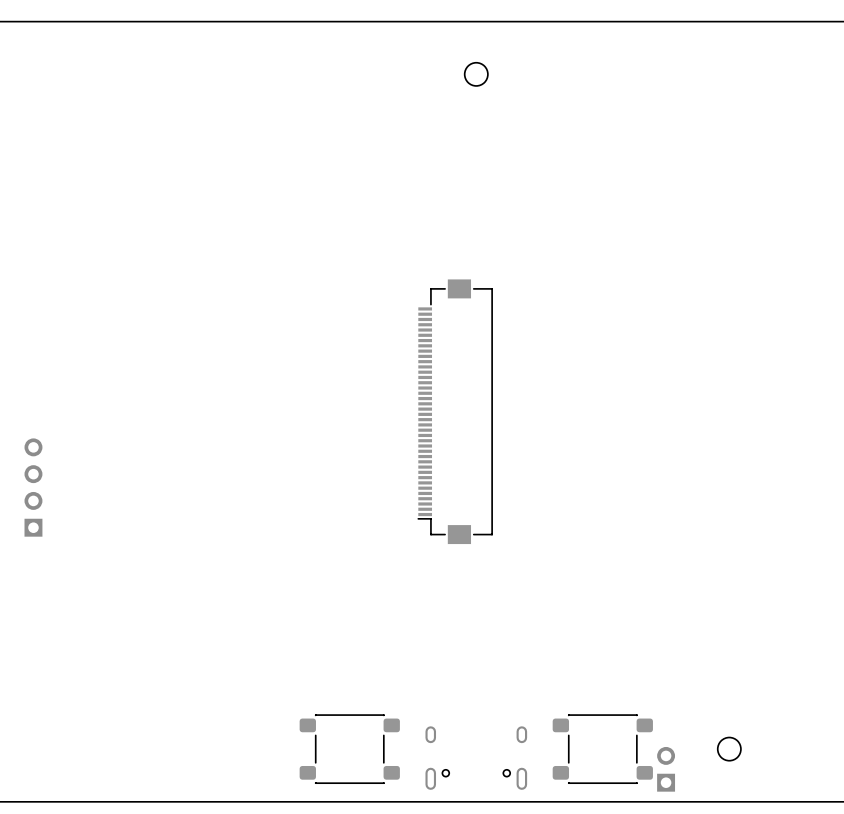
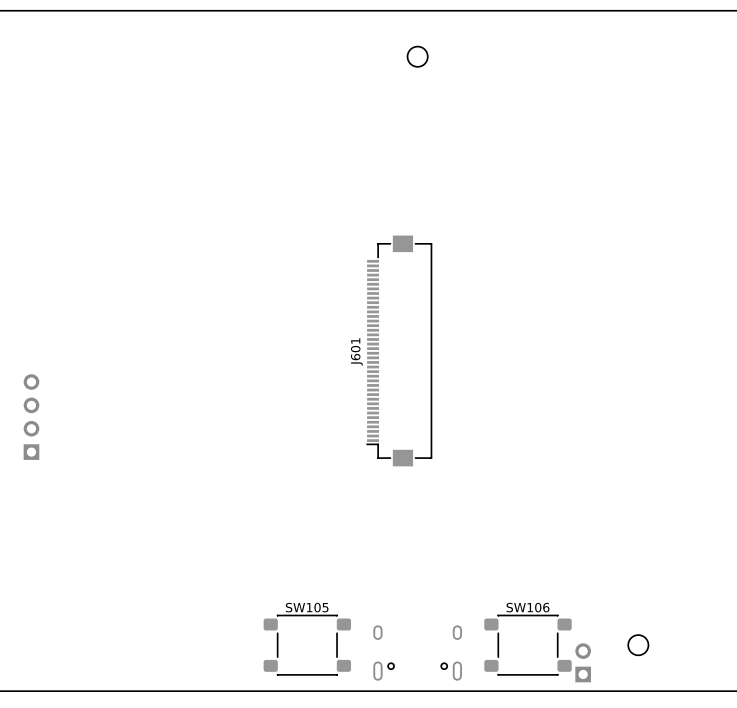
J601 name: none -> J601 (356, 351)
SW105 name: none -> SW105 (307, 607)
SW106 name: none -> SW106 (528, 607)

